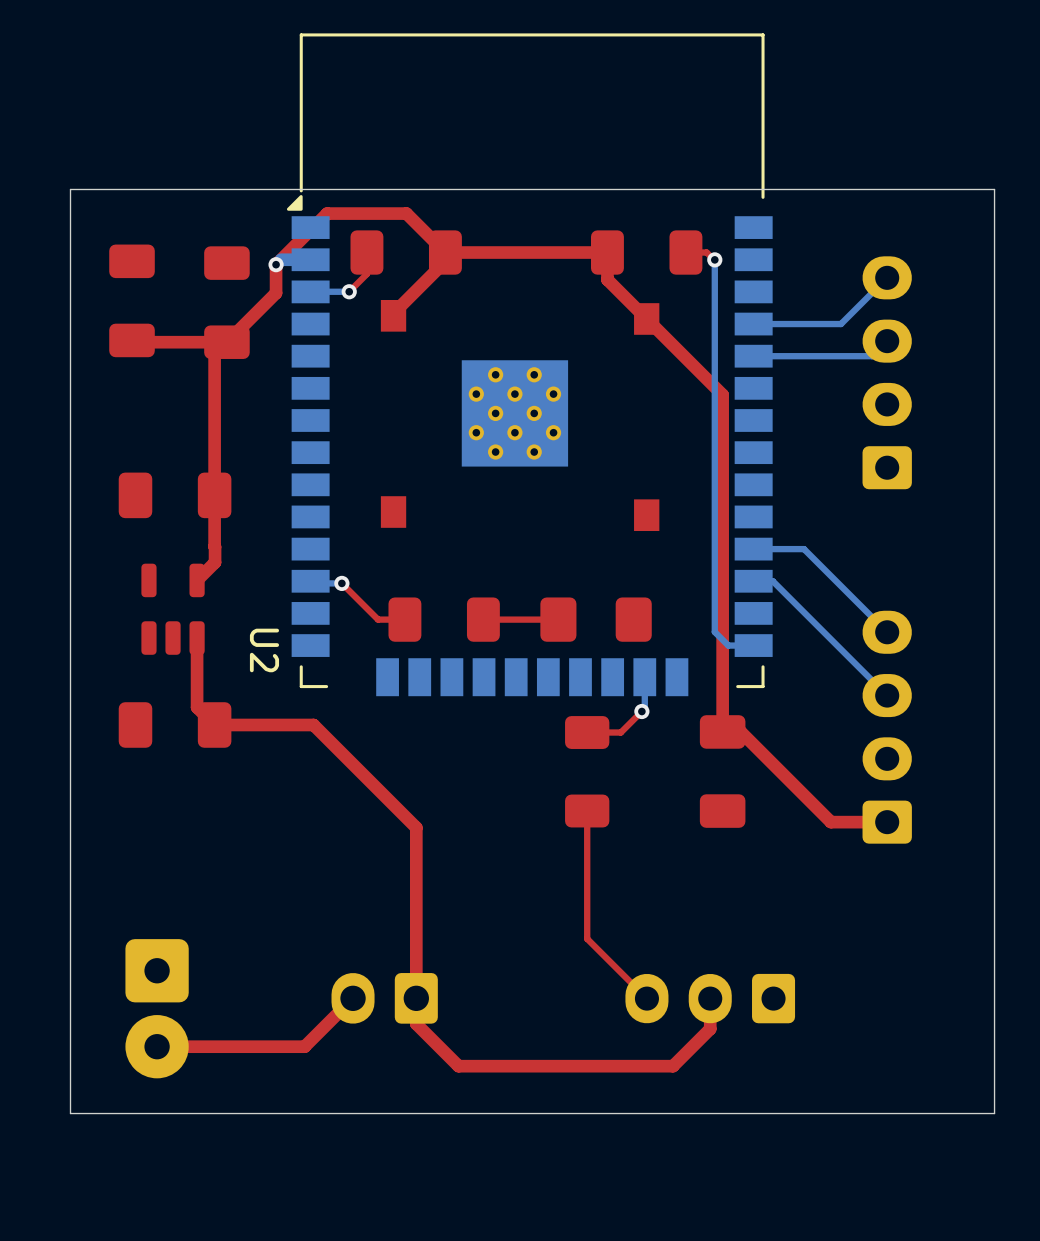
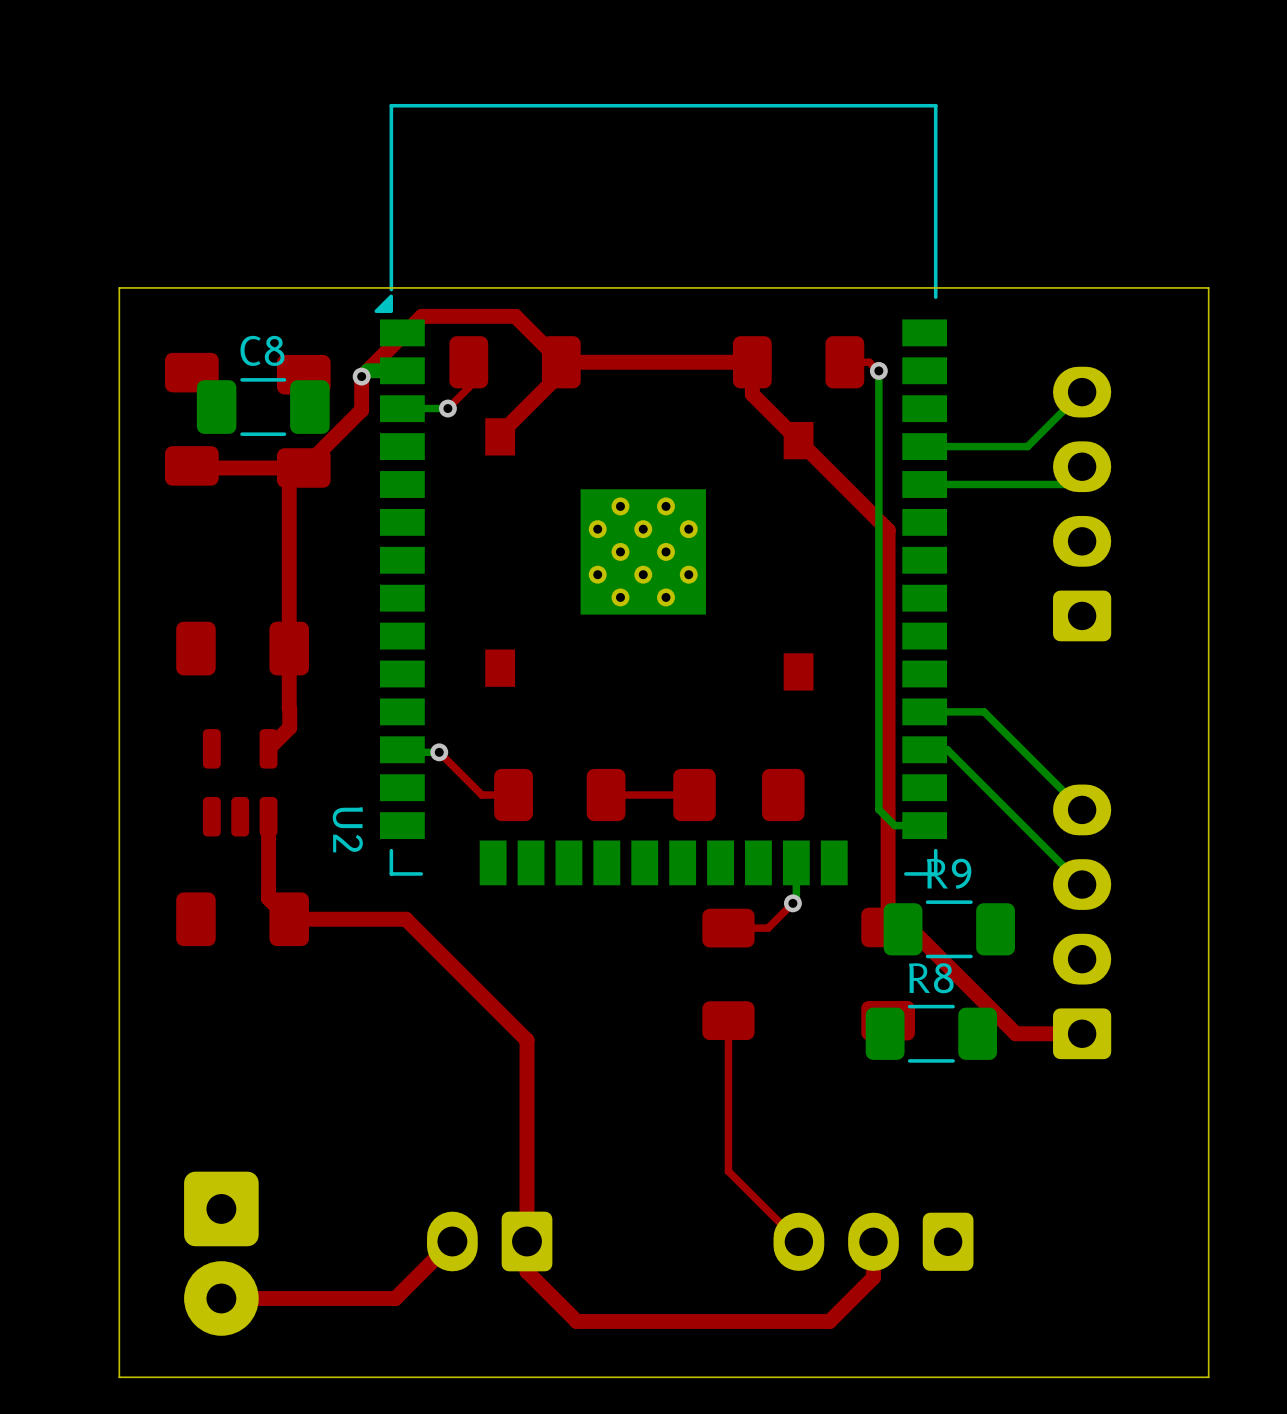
C8: none -> (263, 407)
R9: none -> (949, 929)
R8: none -> (931, 1033)

